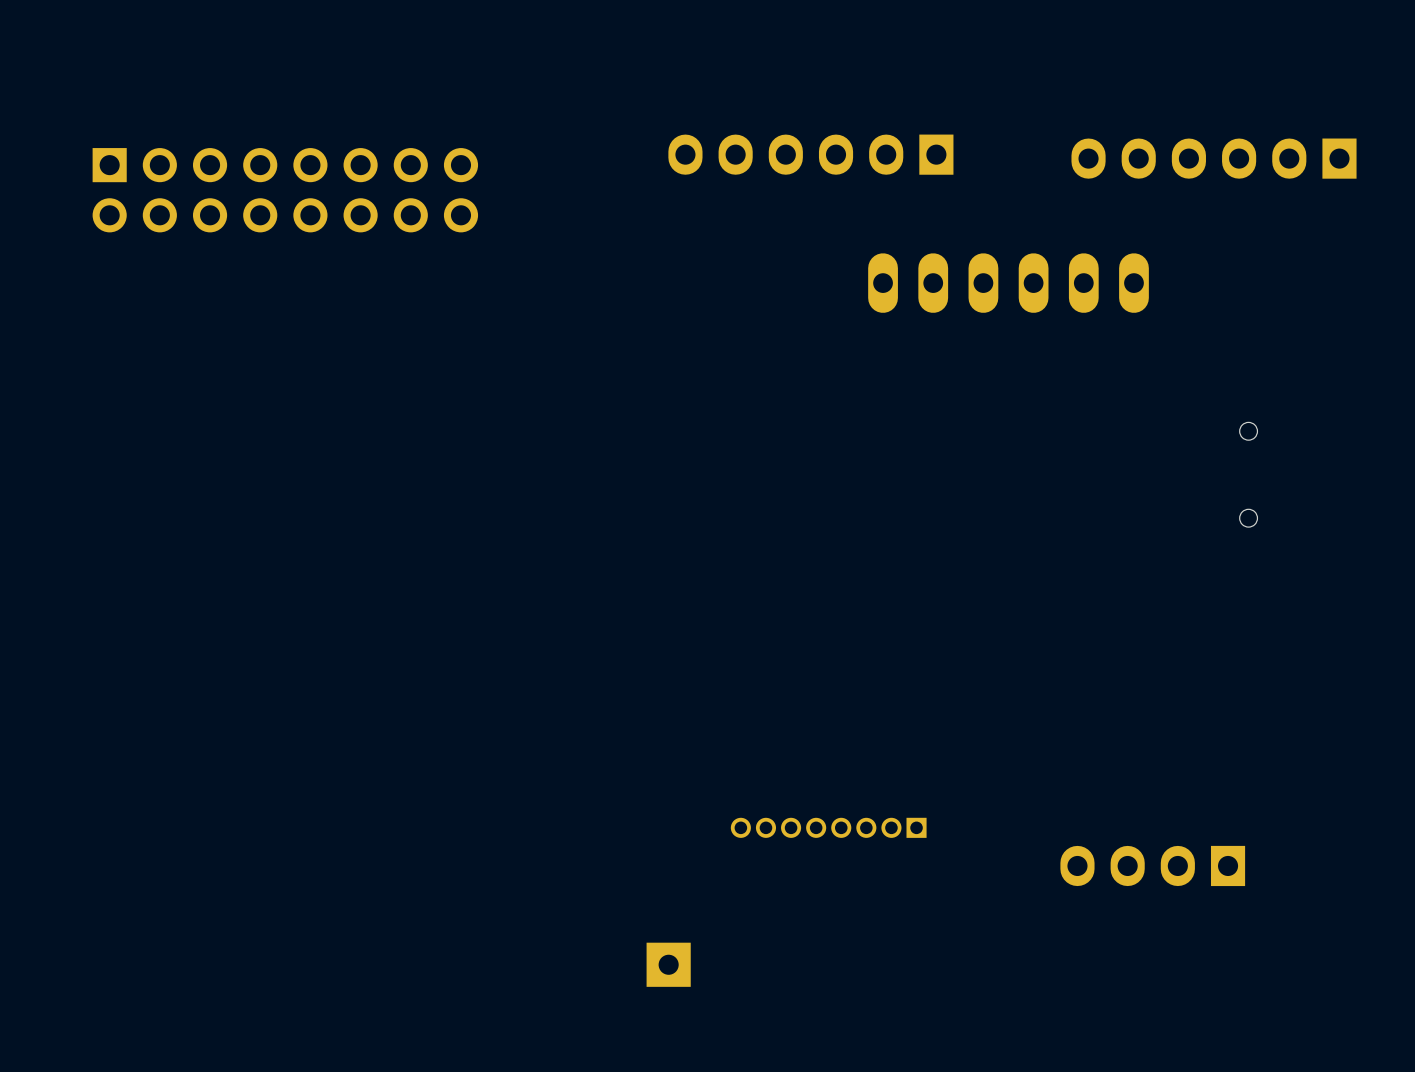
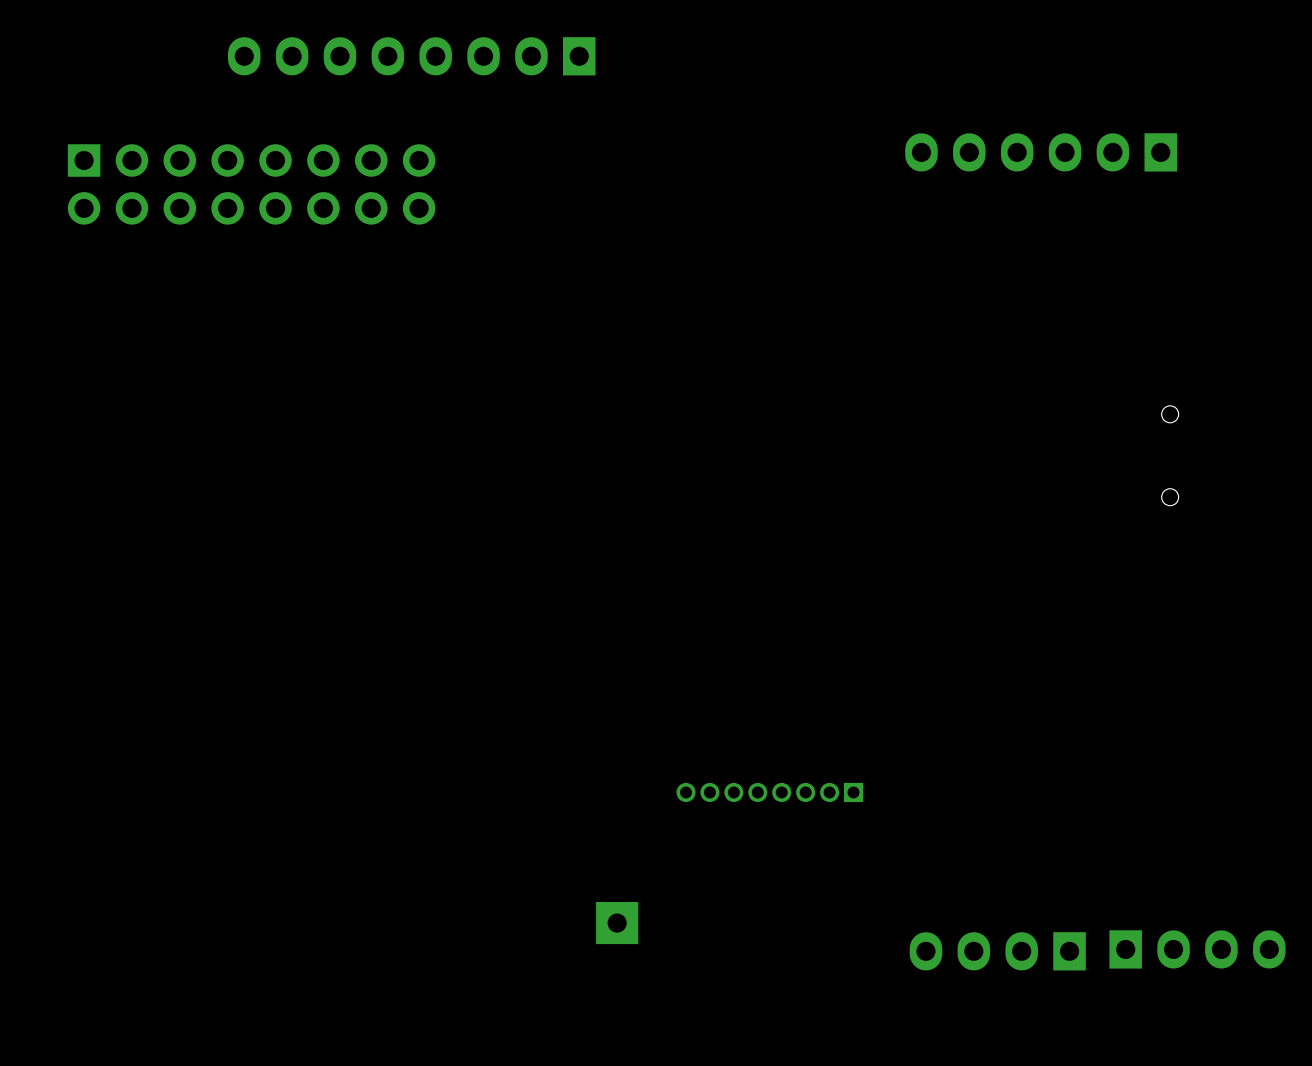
part: none -> (411, 56)
part: (810, 154) -> none
part position: (1214, 158) -> (1041, 152)
part: (1008, 283) -> none
part: (1152, 865) -> none
part: none -> (1197, 949)
part: none -> (997, 951)

